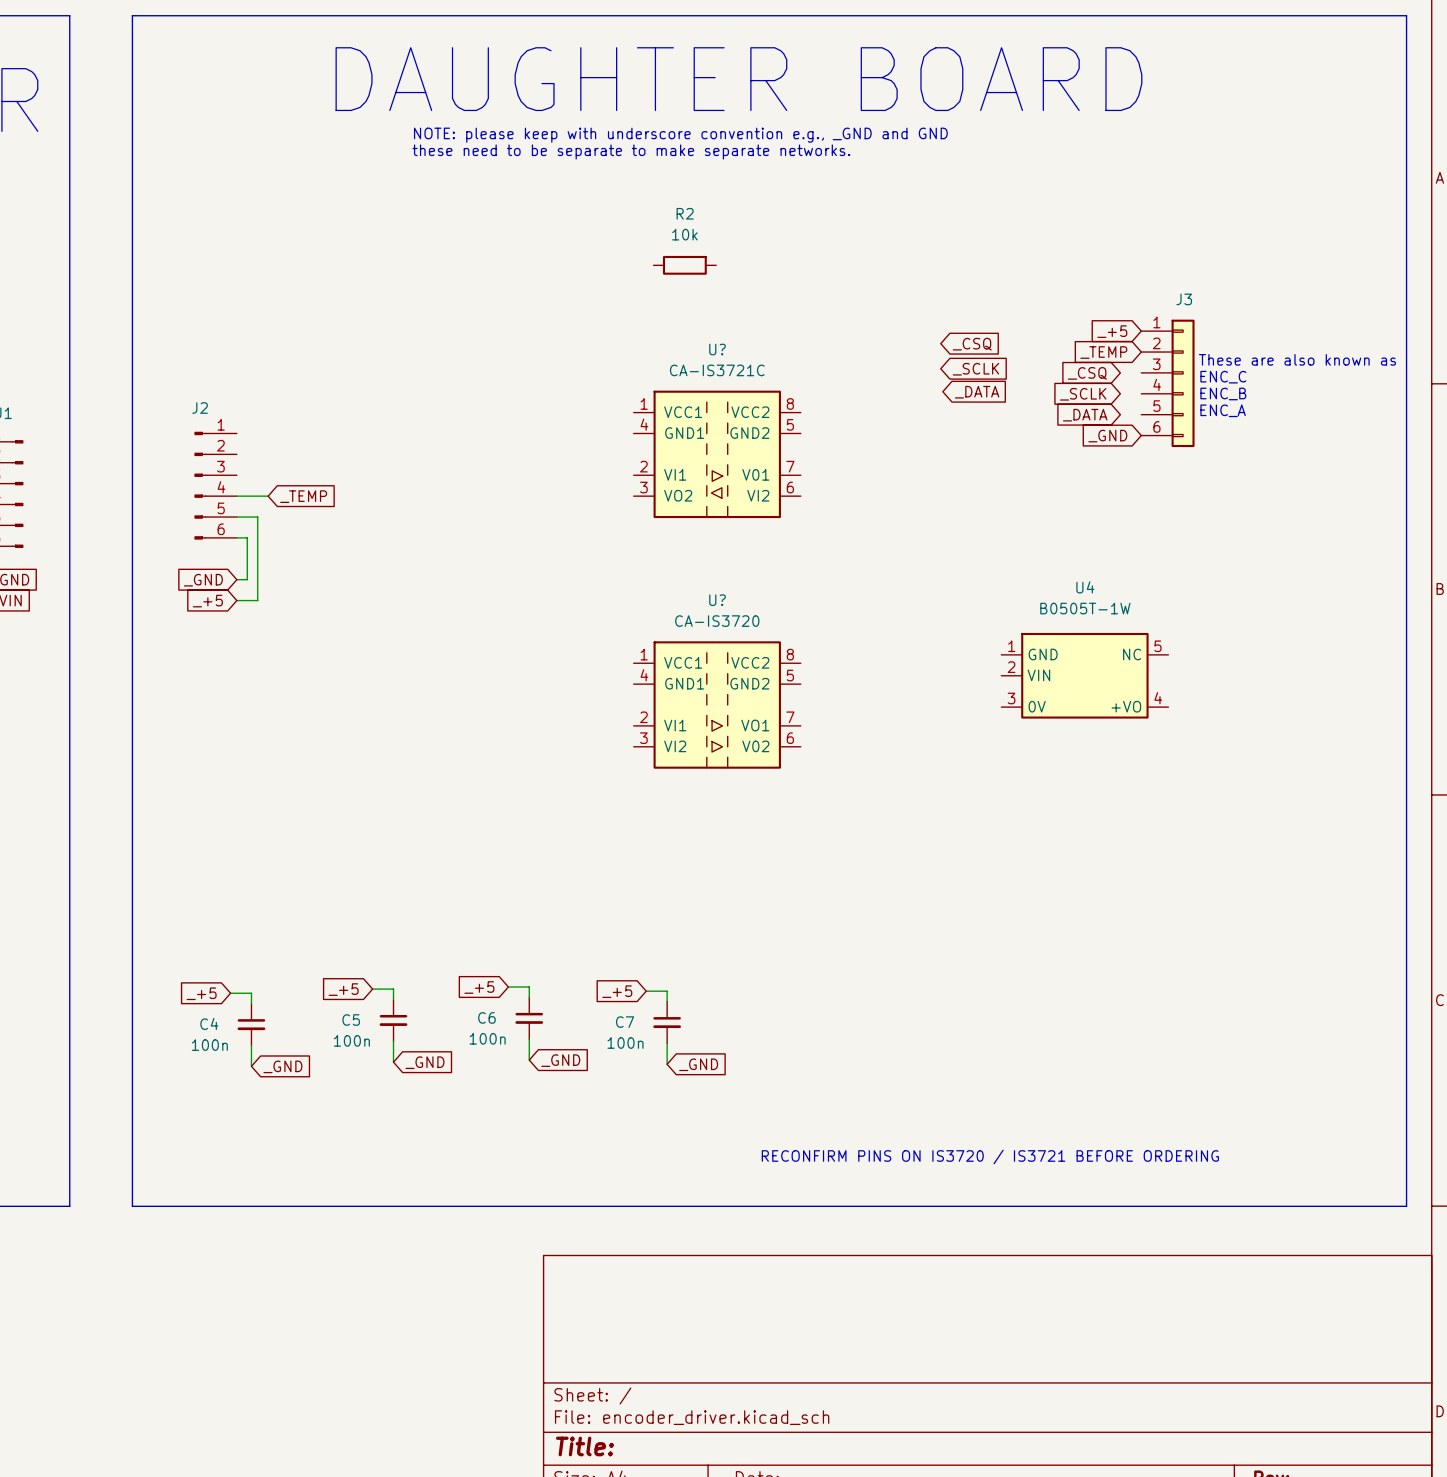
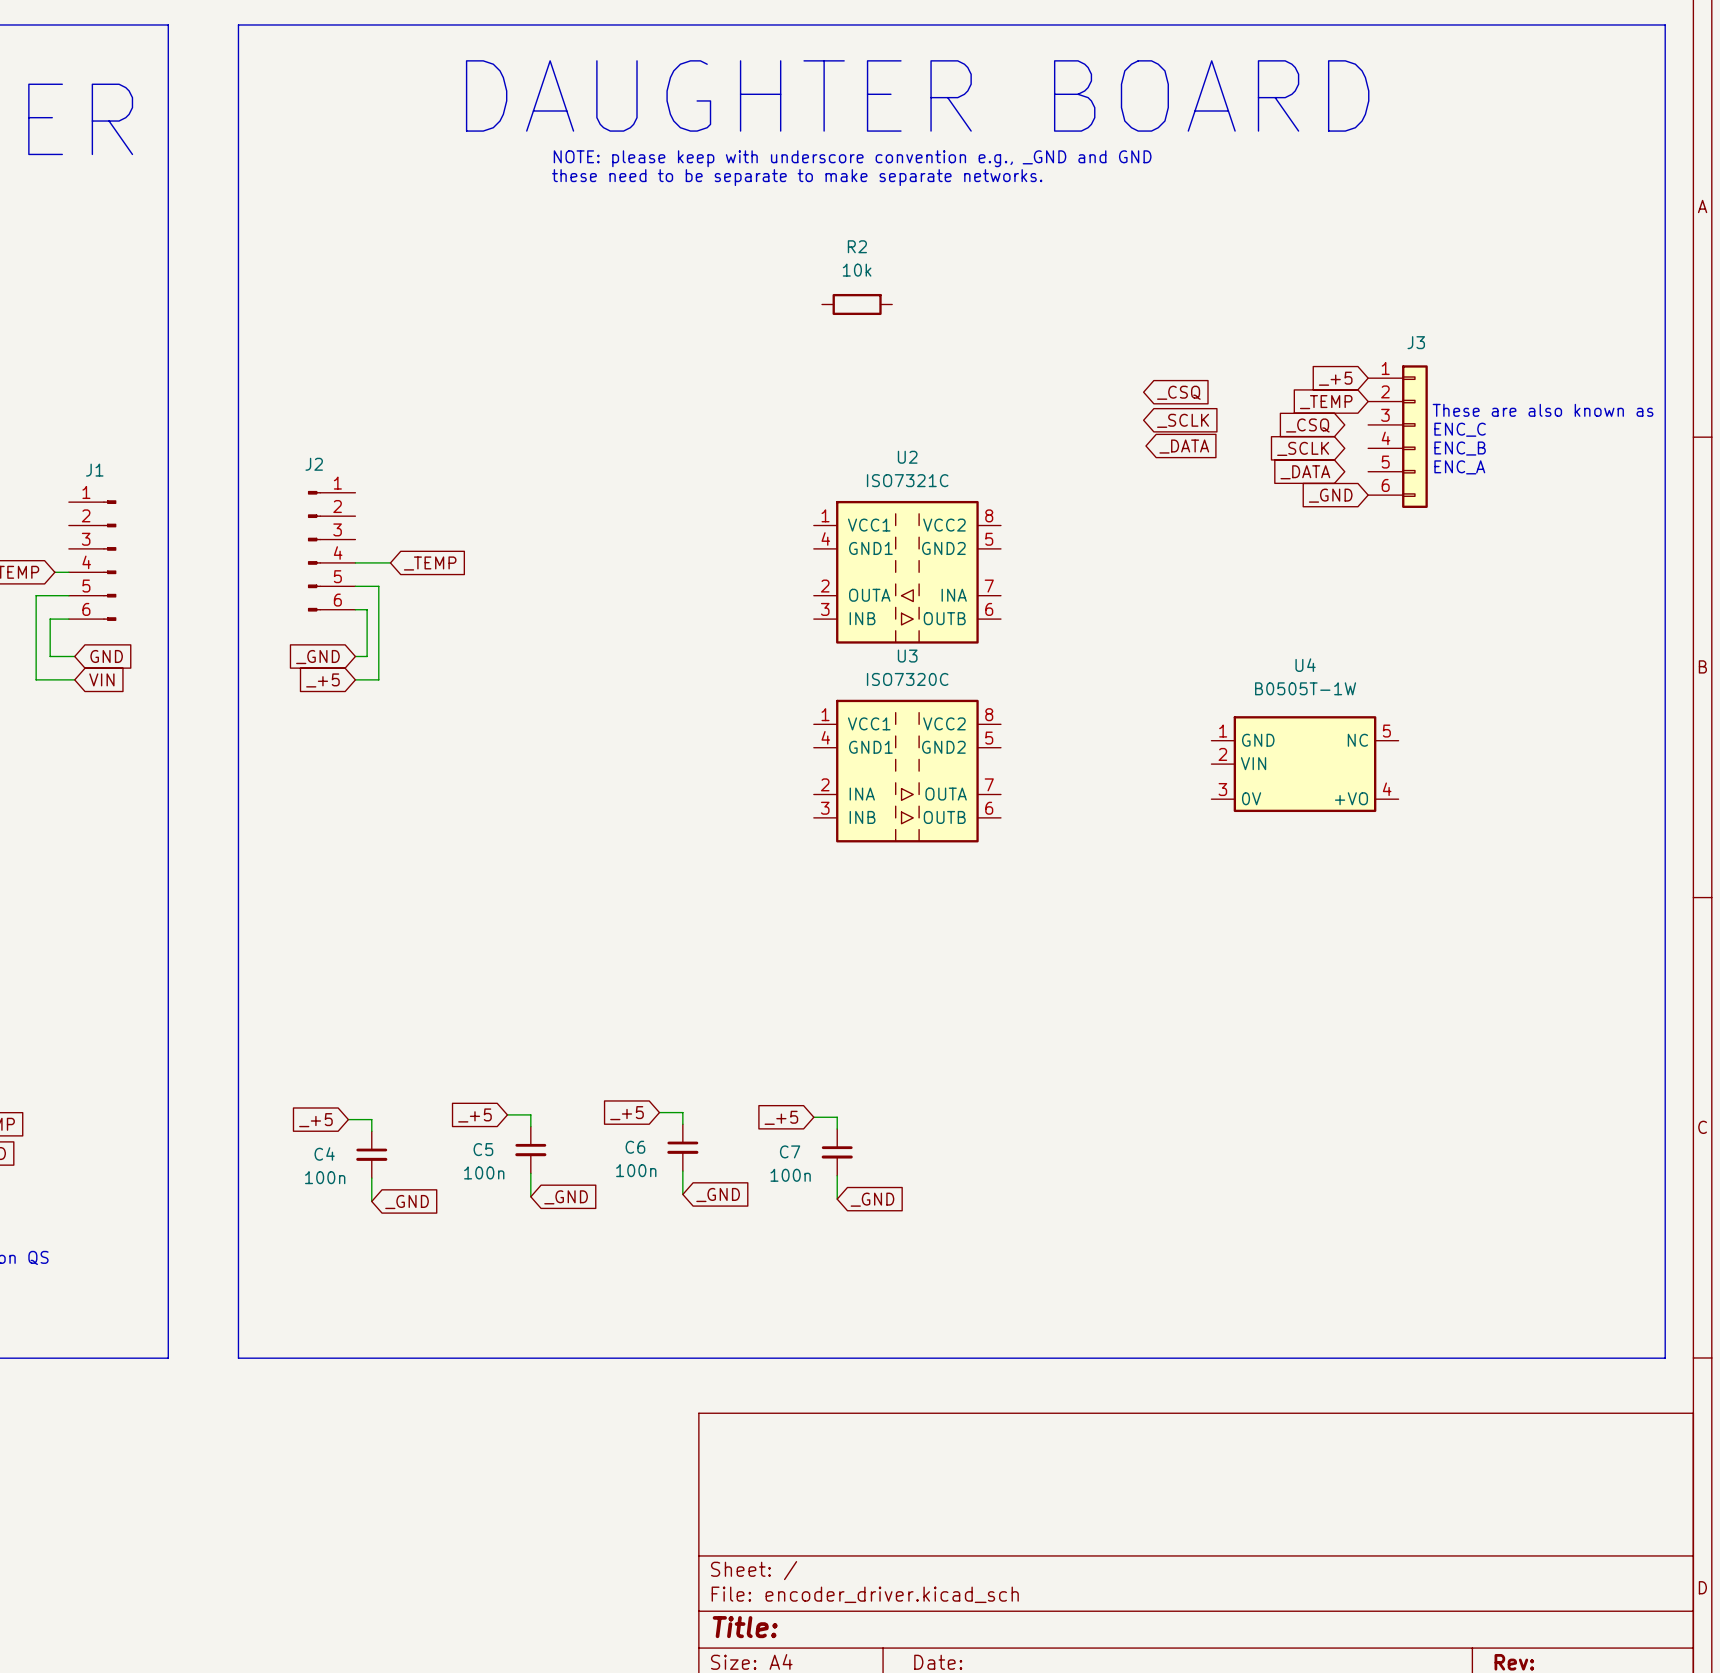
U?: CA-IS3721C (717, 454) -> none
U2: none -> ISO7321C (907, 572)
U3: none -> ISO7320C (907, 771)
U?: CA-IS3720 (717, 705) -> none
text: RECONFIRM PINS ON IS3720 / IS3721 BEFORE ORDERING (990, 1156) -> none

